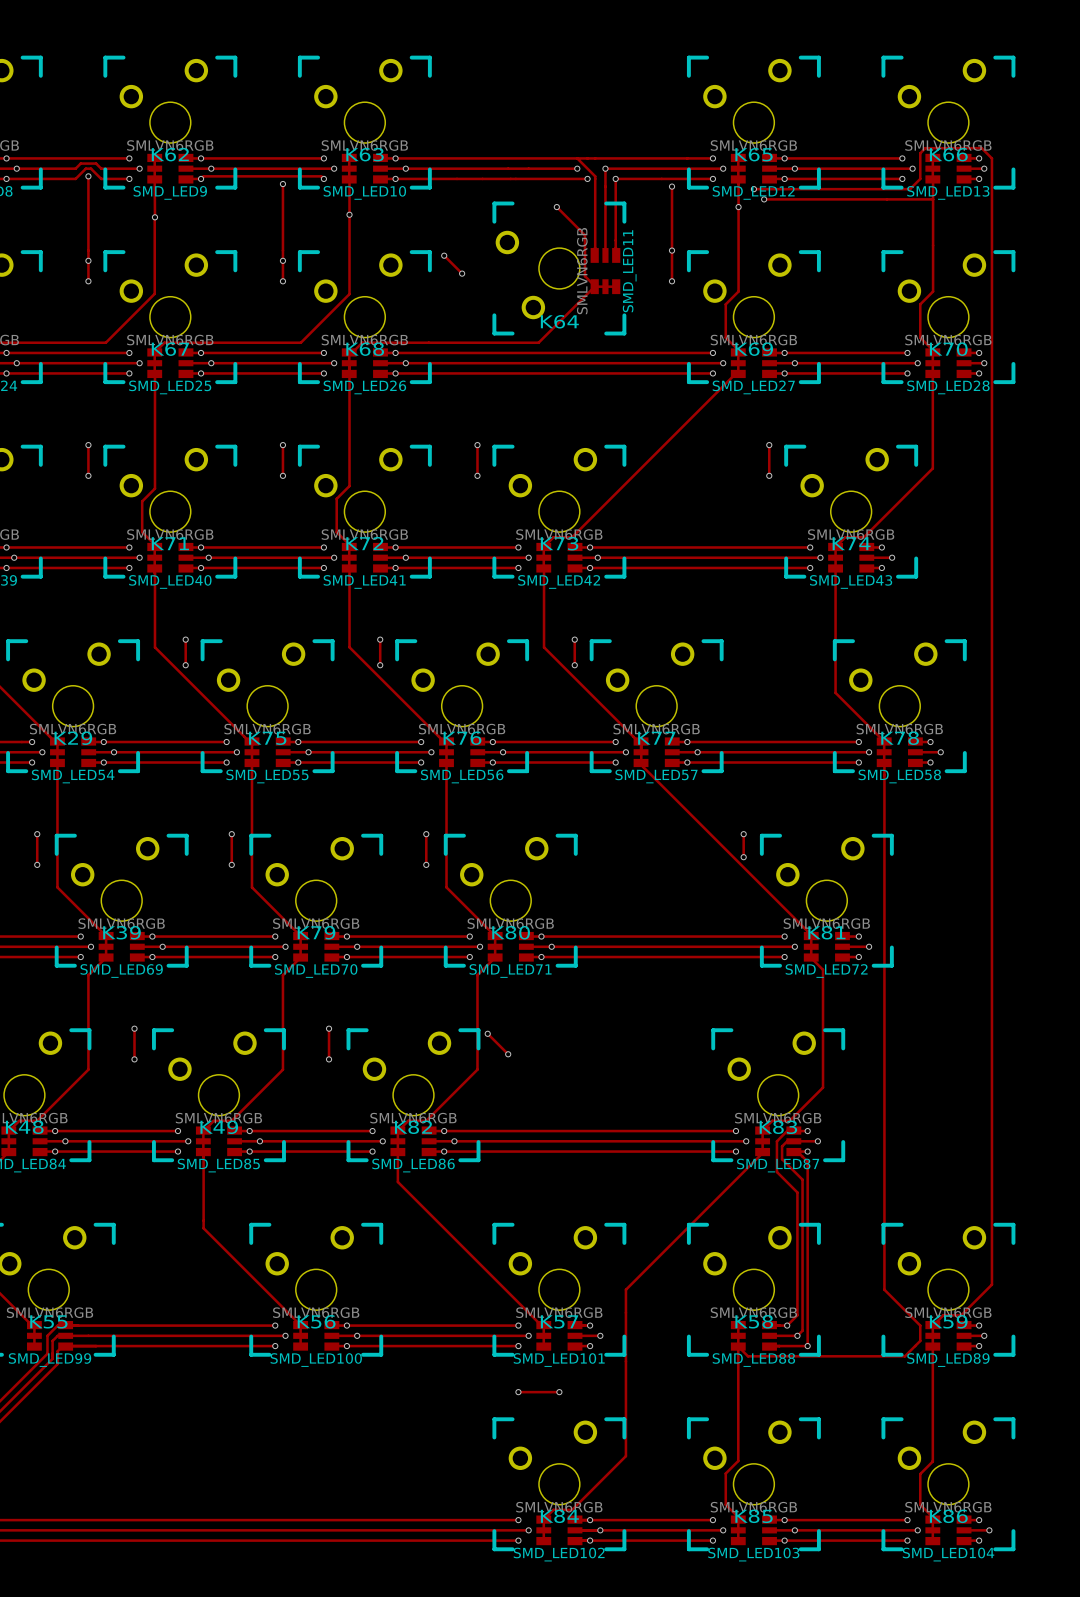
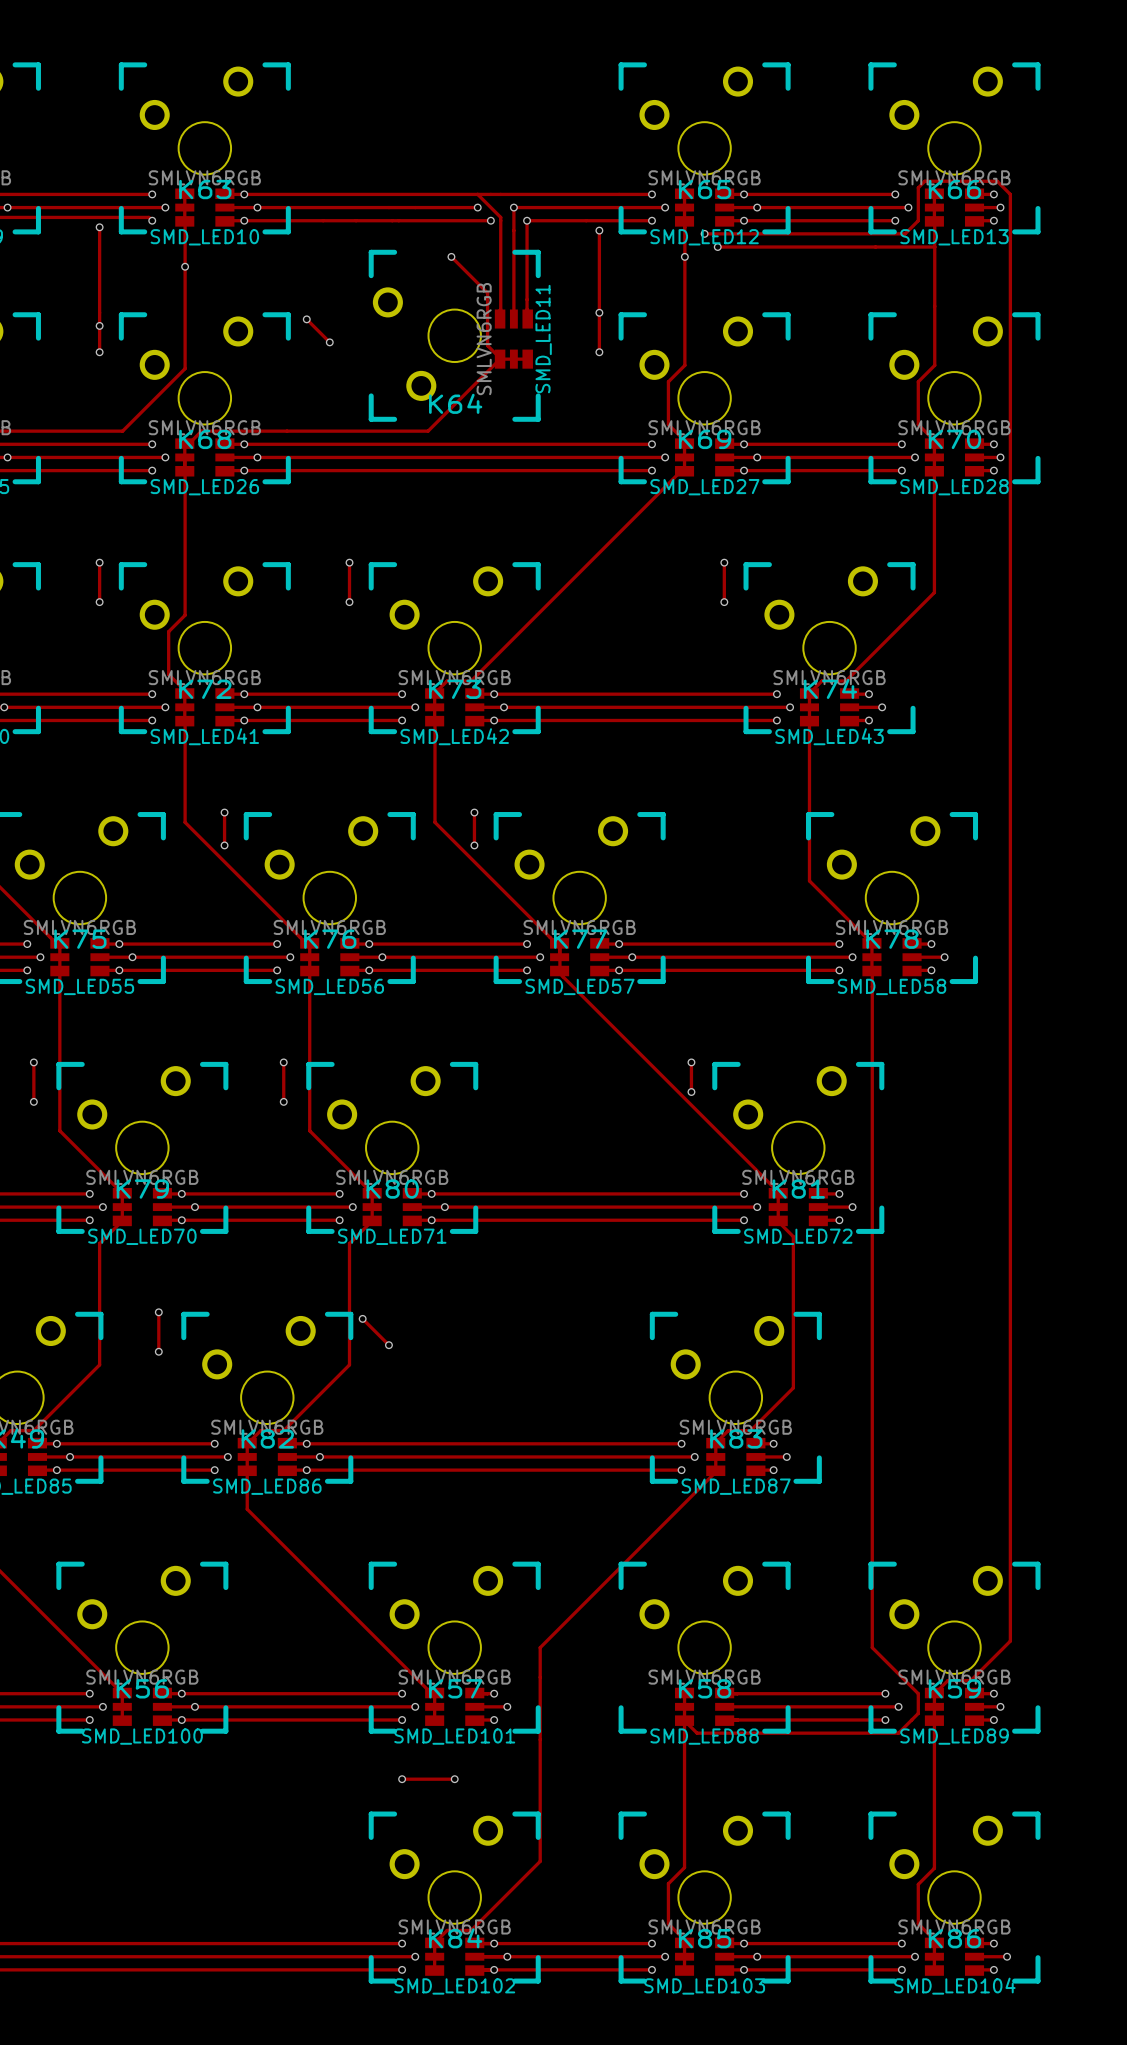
track: (792, 1130) (787, 1130) (776, 1141) (776, 1172) (797, 1192) (797, 1315) (787, 1325) -> (885, 1693) (747, 1693)
track: (793, 1141) (787, 1141) (782, 1146) (782, 1159) (802, 1179) (802, 1330) (797, 1335) -> (898, 1706) (760, 1706)
track: (793, 1152) (797, 1152) (807, 1161) (807, 1346) -> (885, 1720) (773, 1720)
via: (787, 1325) -> none
via: none -> (885, 1693)
via: (797, 1335) -> none
via: none -> (898, 1706)
via: (807, 1346) -> none
via: none -> (885, 1720)

